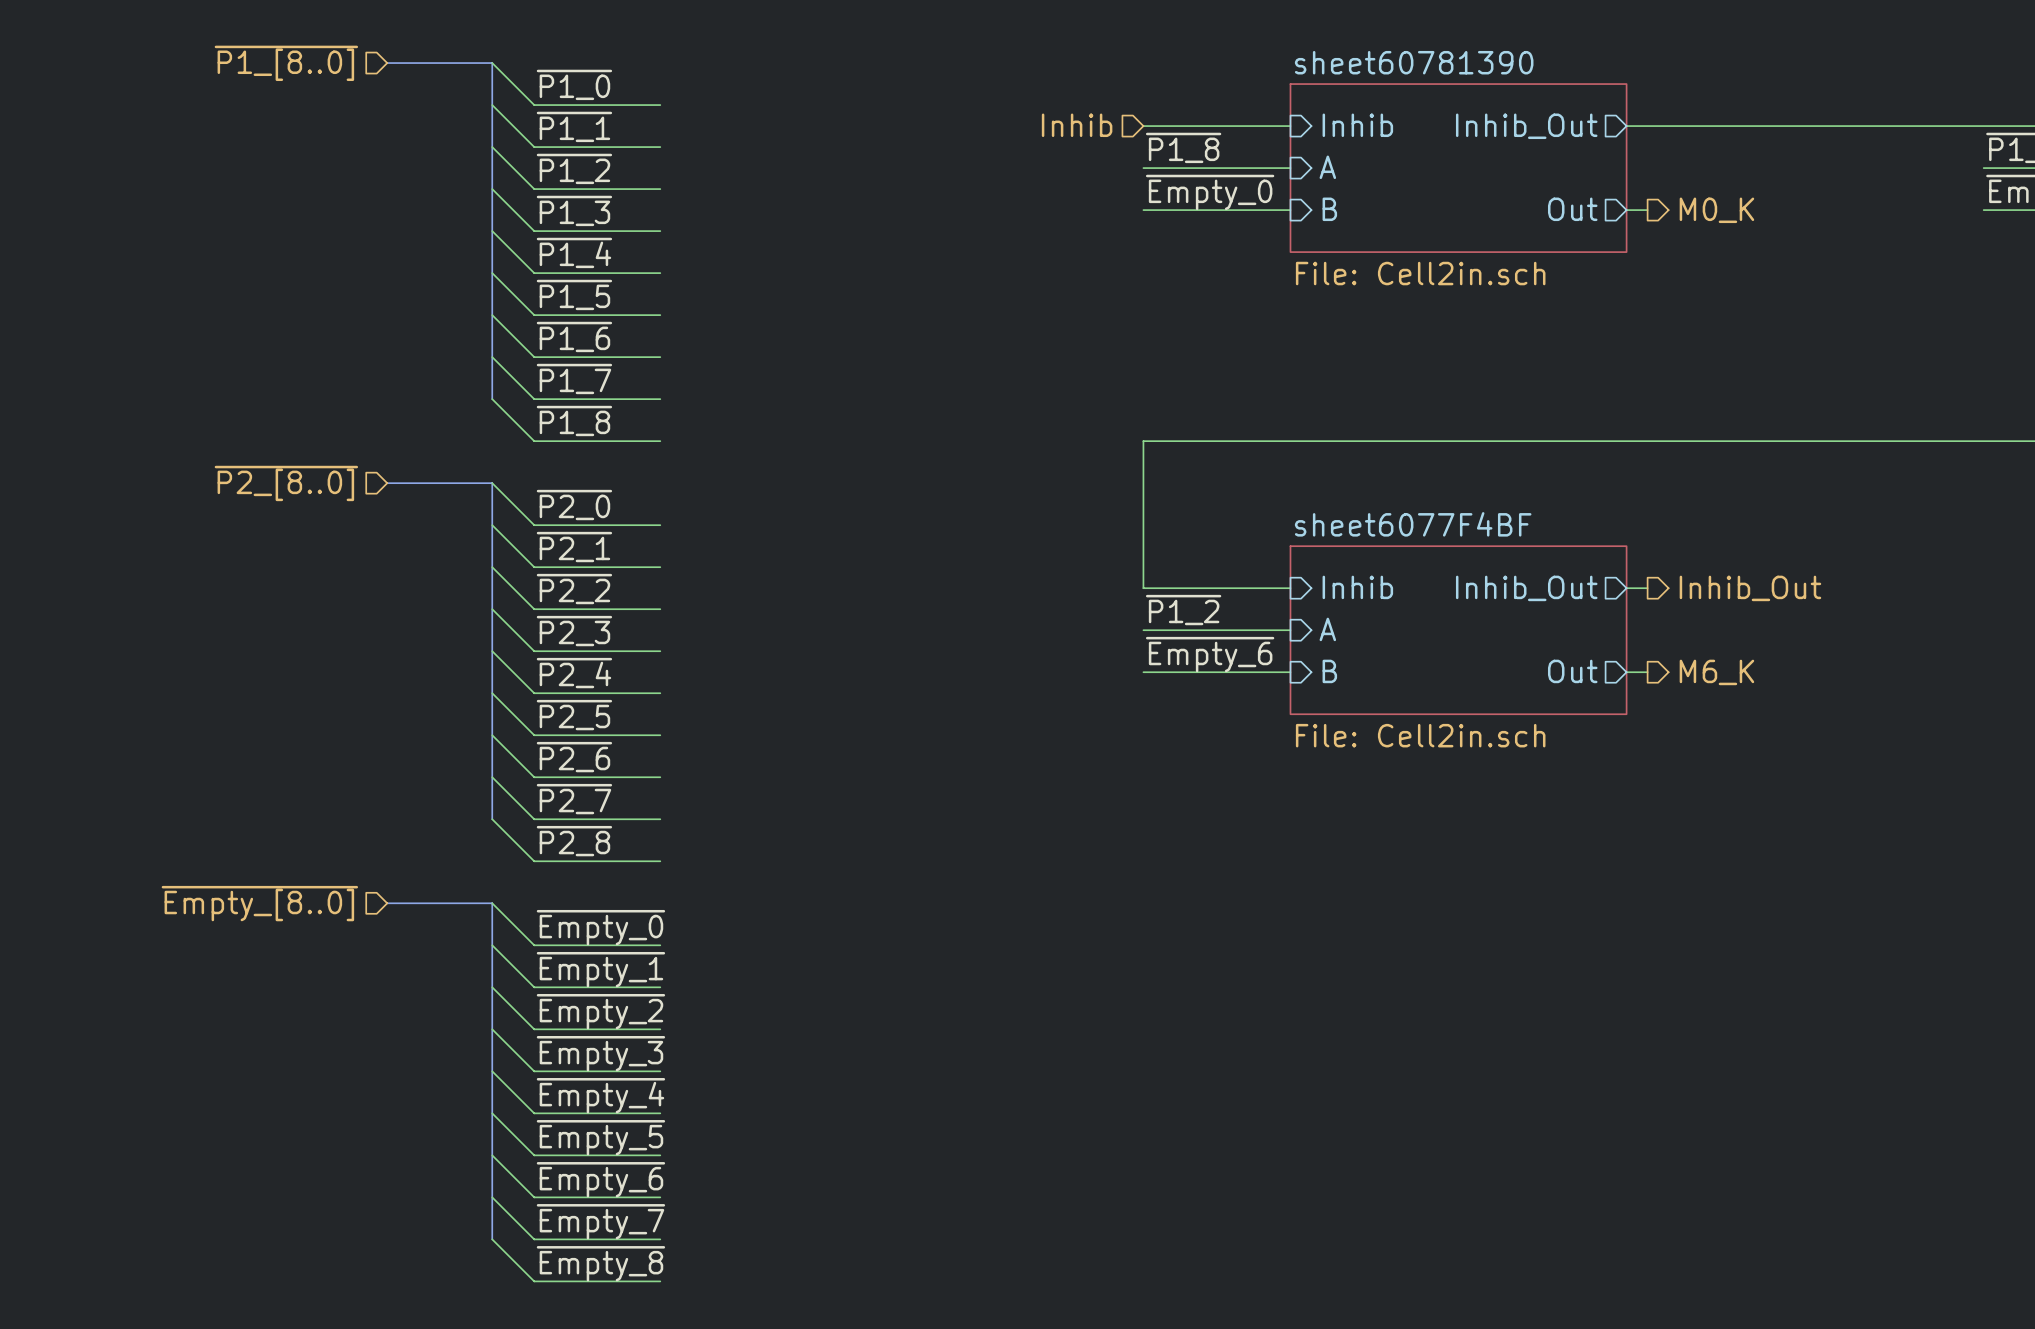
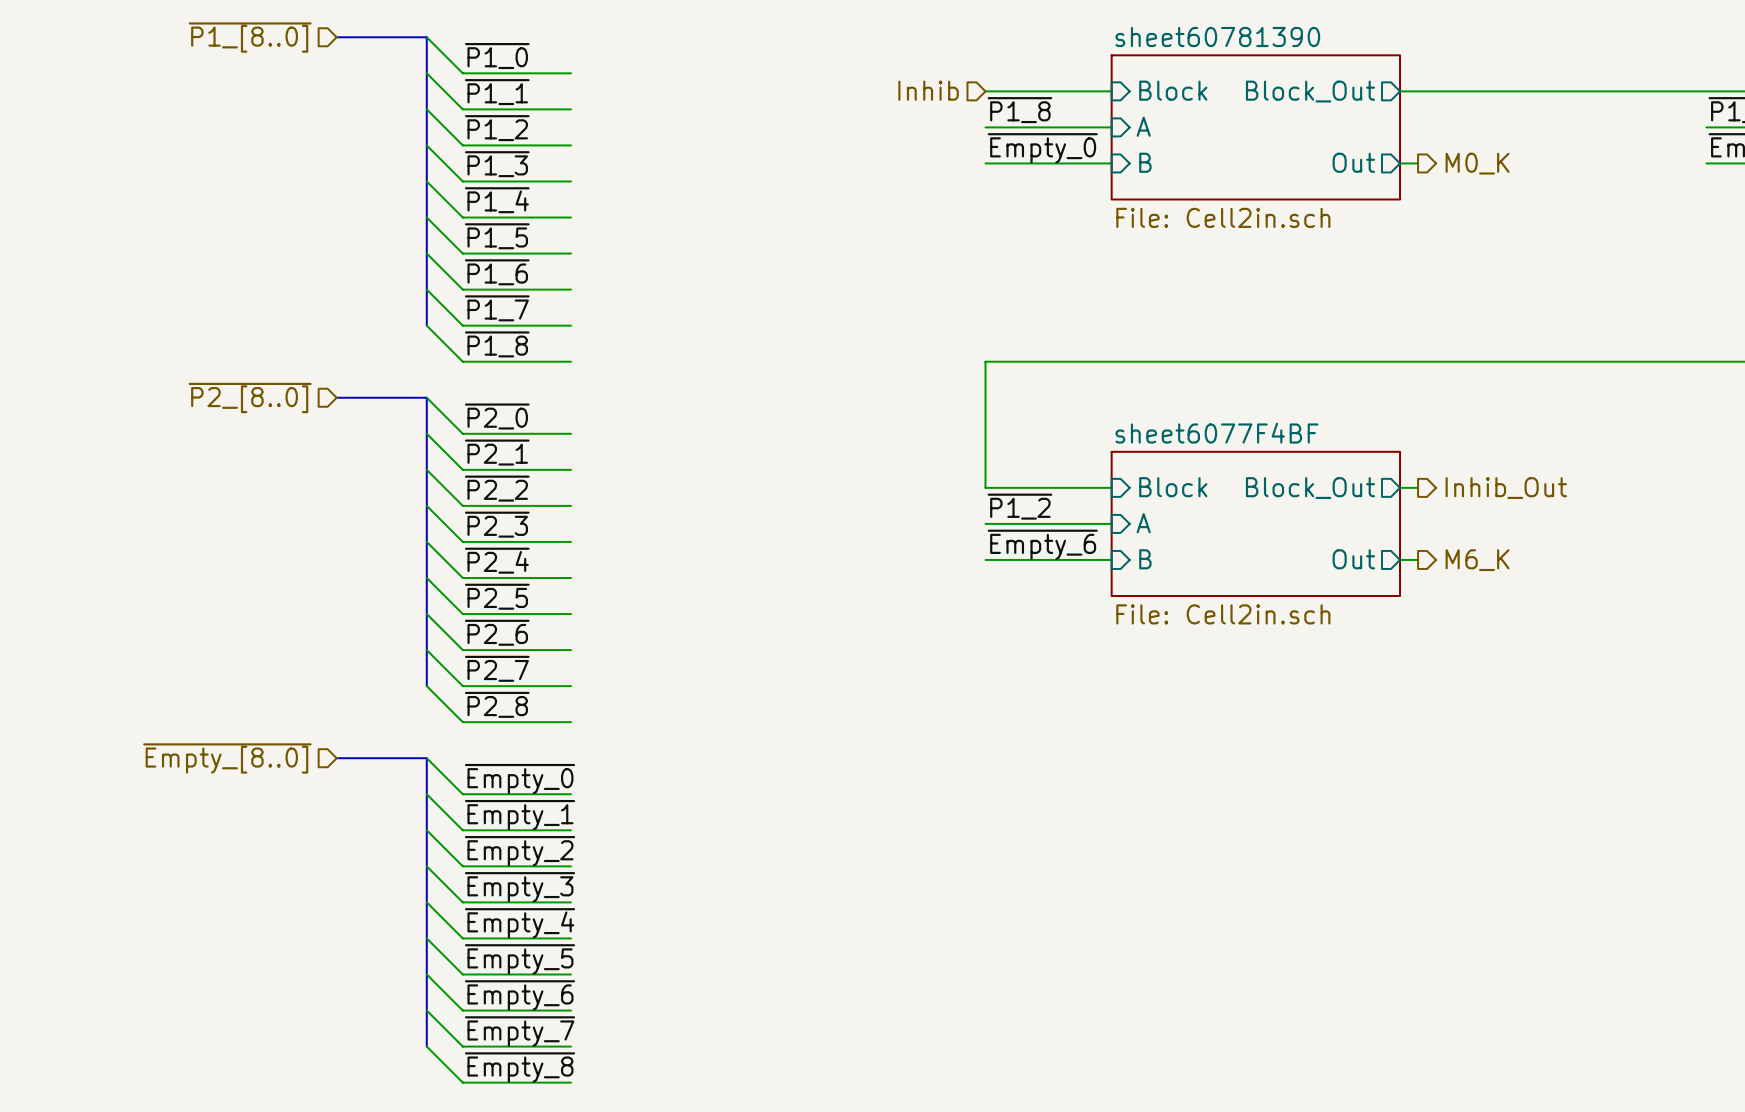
sheet pin: Inhib (1357, 125) -> Block (1173, 90)
sheet pin: Inhib_Out (1526, 126) -> Block_Out (1310, 91)
sheet pin: Inhib (1357, 587) -> Block (1173, 487)
sheet pin: Inhib_Out (1526, 588) -> Block_Out (1310, 488)

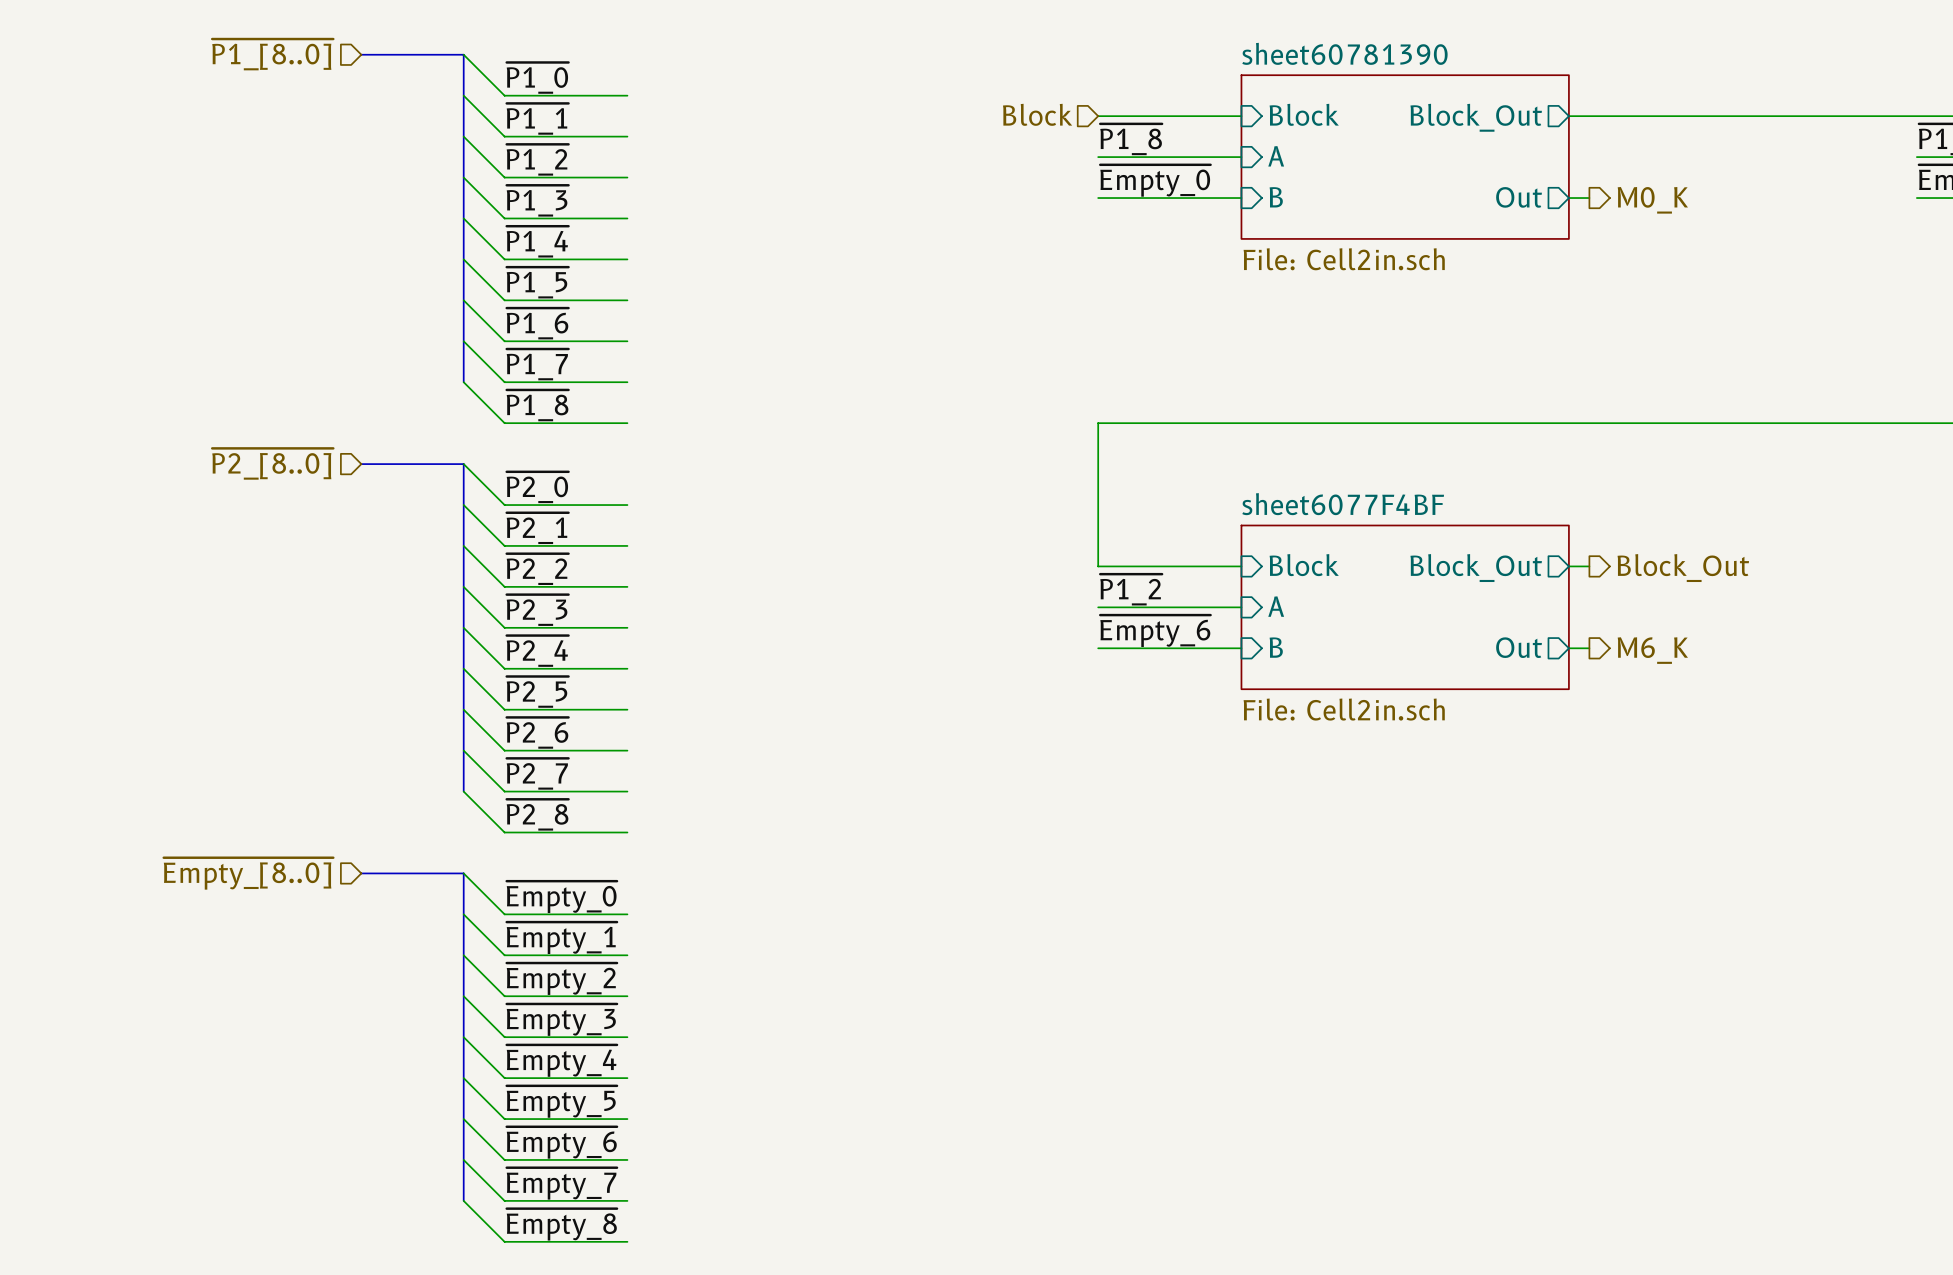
hierarchical label: Inhib (928, 90) -> Block (1037, 114)
hierarchical label: Inhib_Out (1506, 488) -> Block_Out (1683, 568)

